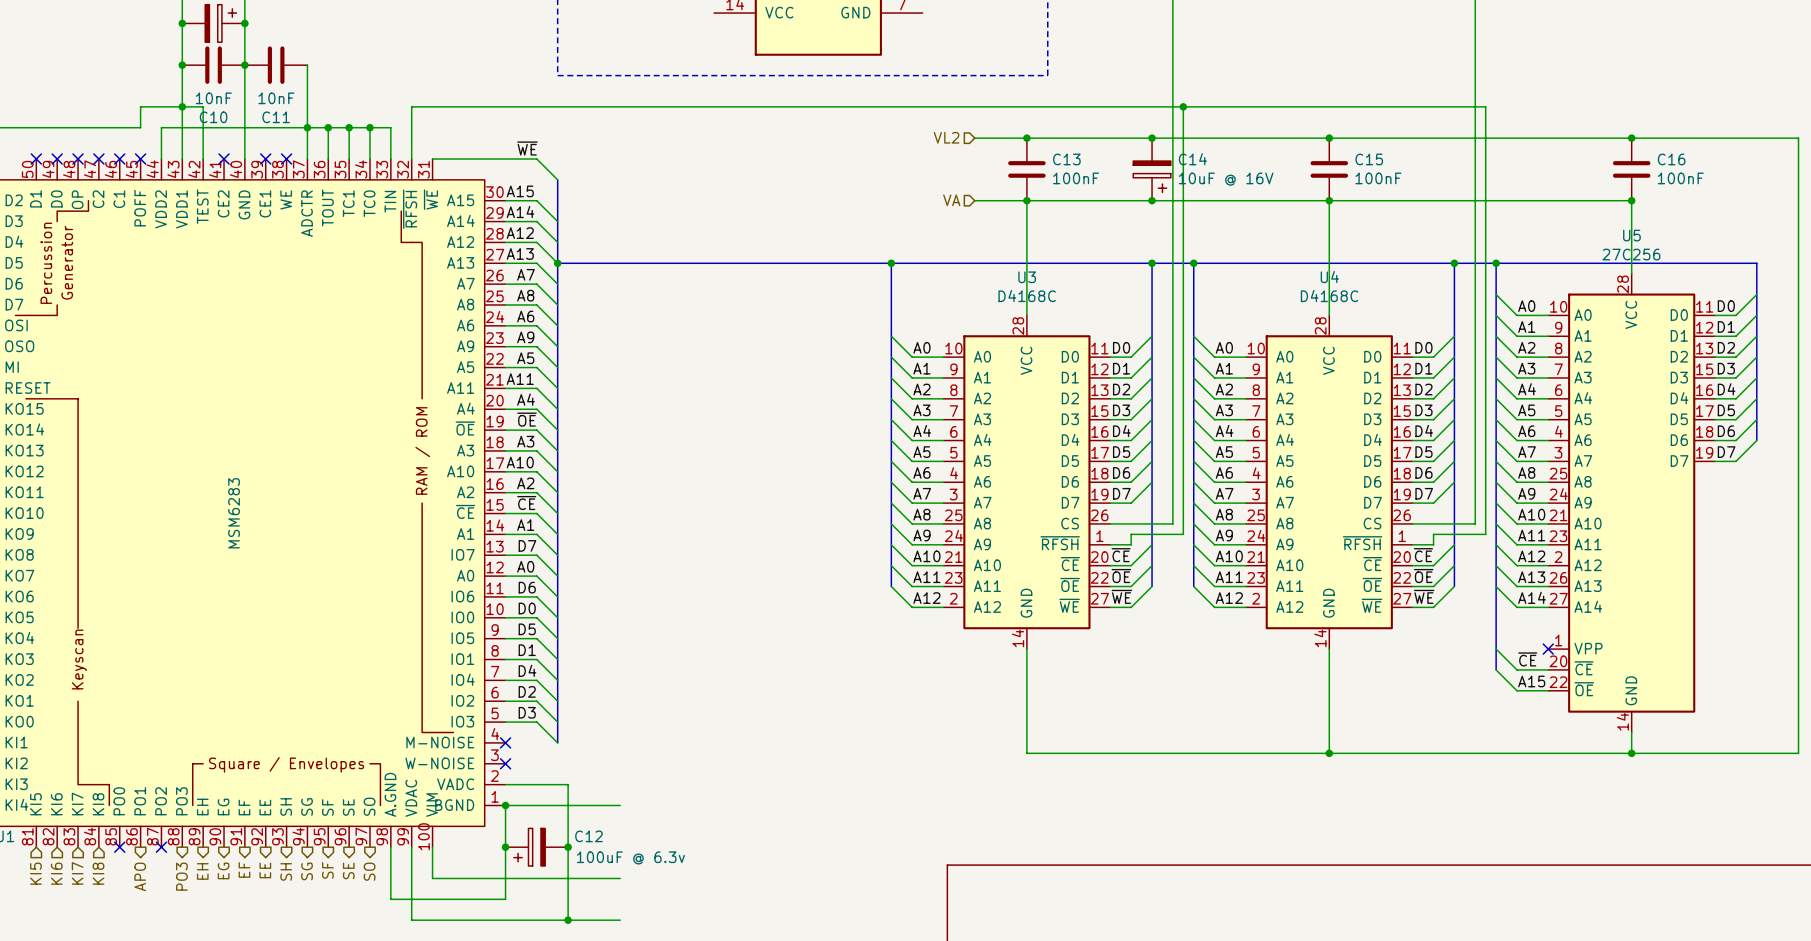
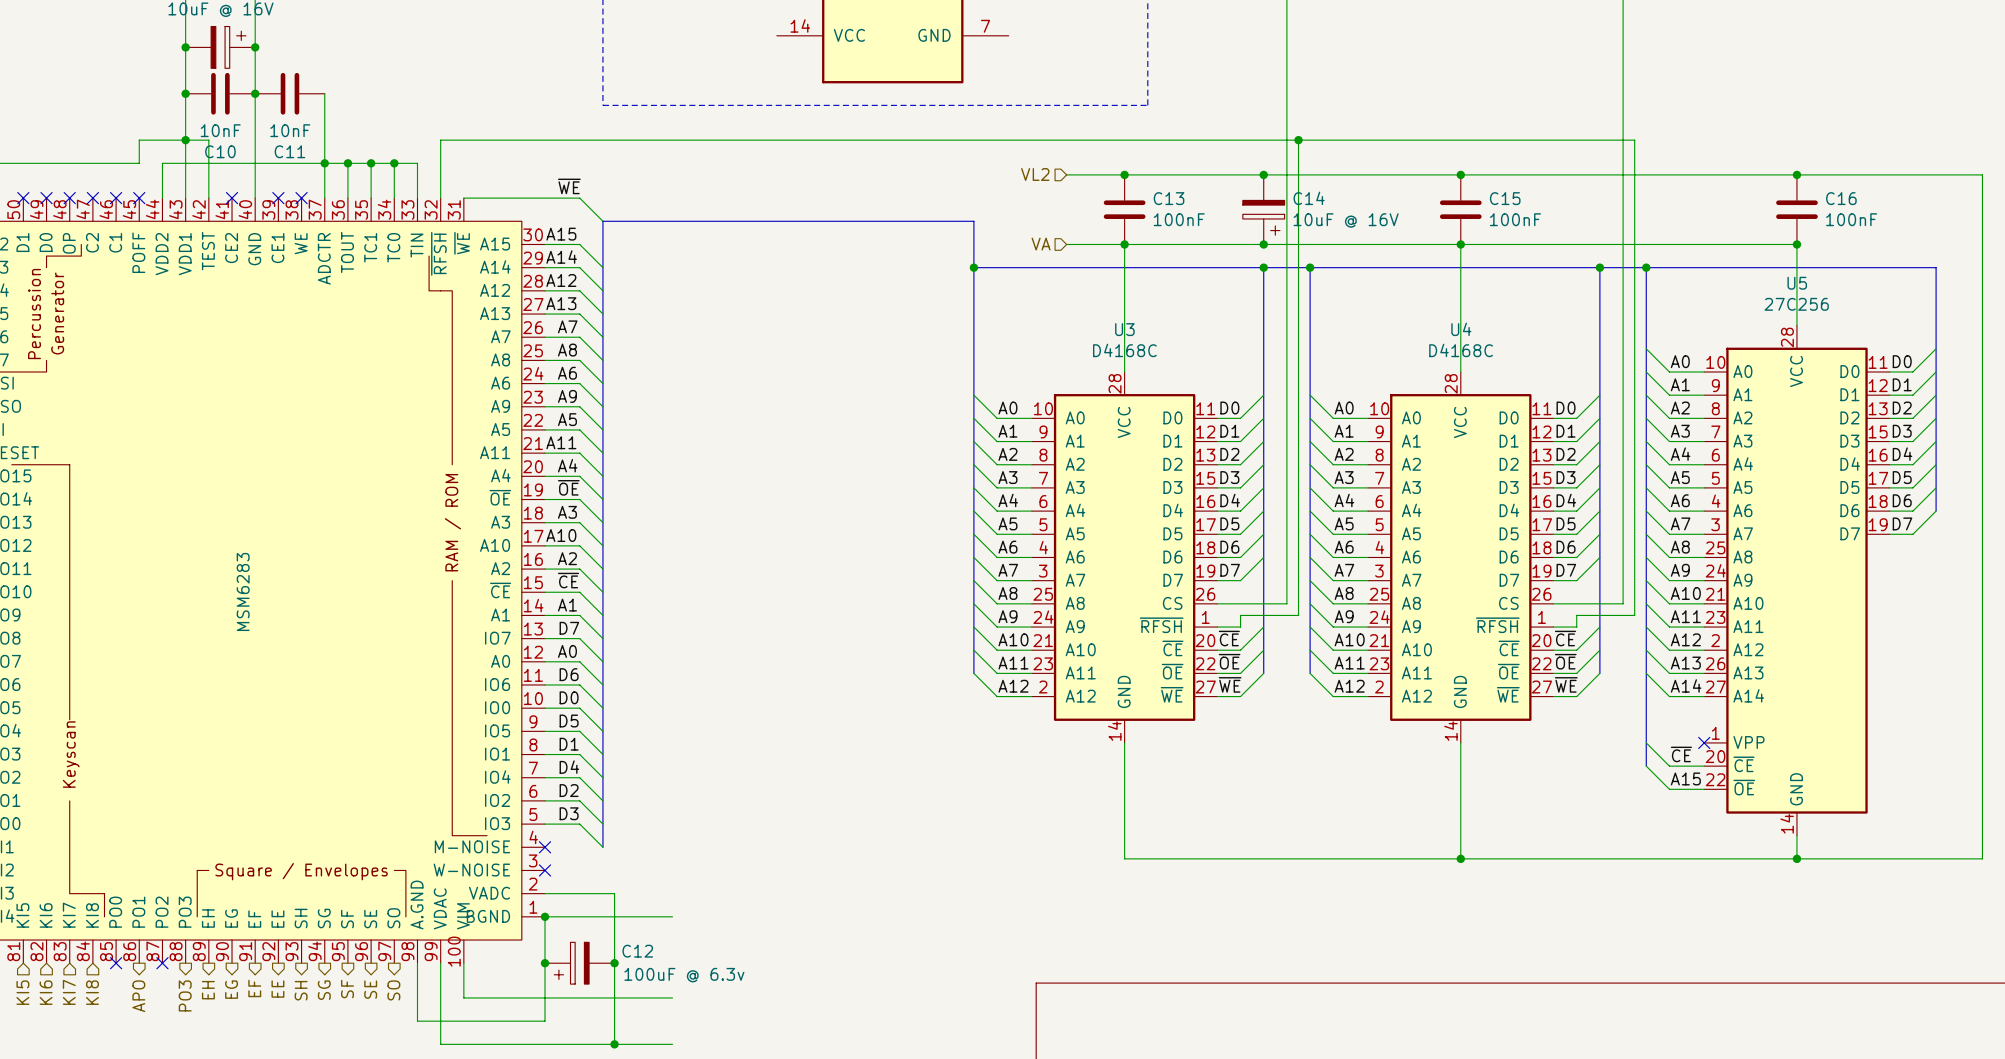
bus: none -> (602, 221) (973, 221) (973, 314)
bus: none -> (1263, 267) (1263, 314)
junction: none -> (1263, 267)
bus: none -> (1310, 267) (1310, 314)
junction: none -> (1310, 267)
bus: none -> (1599, 267) (1599, 314)
junction: none -> (1599, 267)
bus: none -> (1646, 267) (1646, 314)
junction: none -> (1646, 267)
bus: (557, 263) (1756, 263) -> (973, 267) (1936, 267) (1936, 314)
junction: (557, 263) -> none
junction position: (891, 263) -> (973, 267)
junction: (1152, 263) -> none
junction: (1193, 263) -> none
junction: (1454, 263) -> none
junction: (1496, 263) -> none

